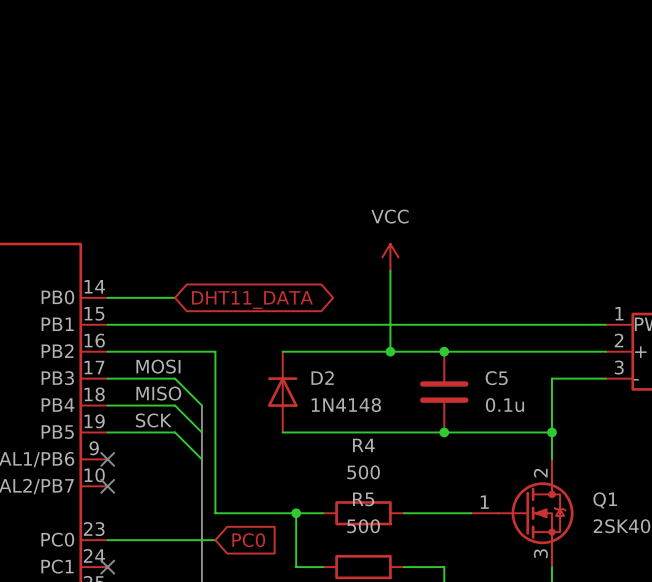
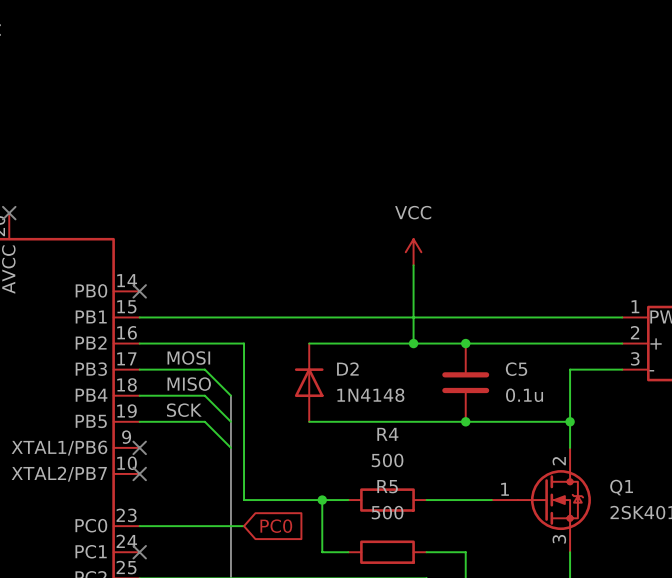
wire: (107, 297) (175, 297) -> none
no-connect mark: none -> (139, 291)
global label: DHT11_DATA (252, 300) -> none

